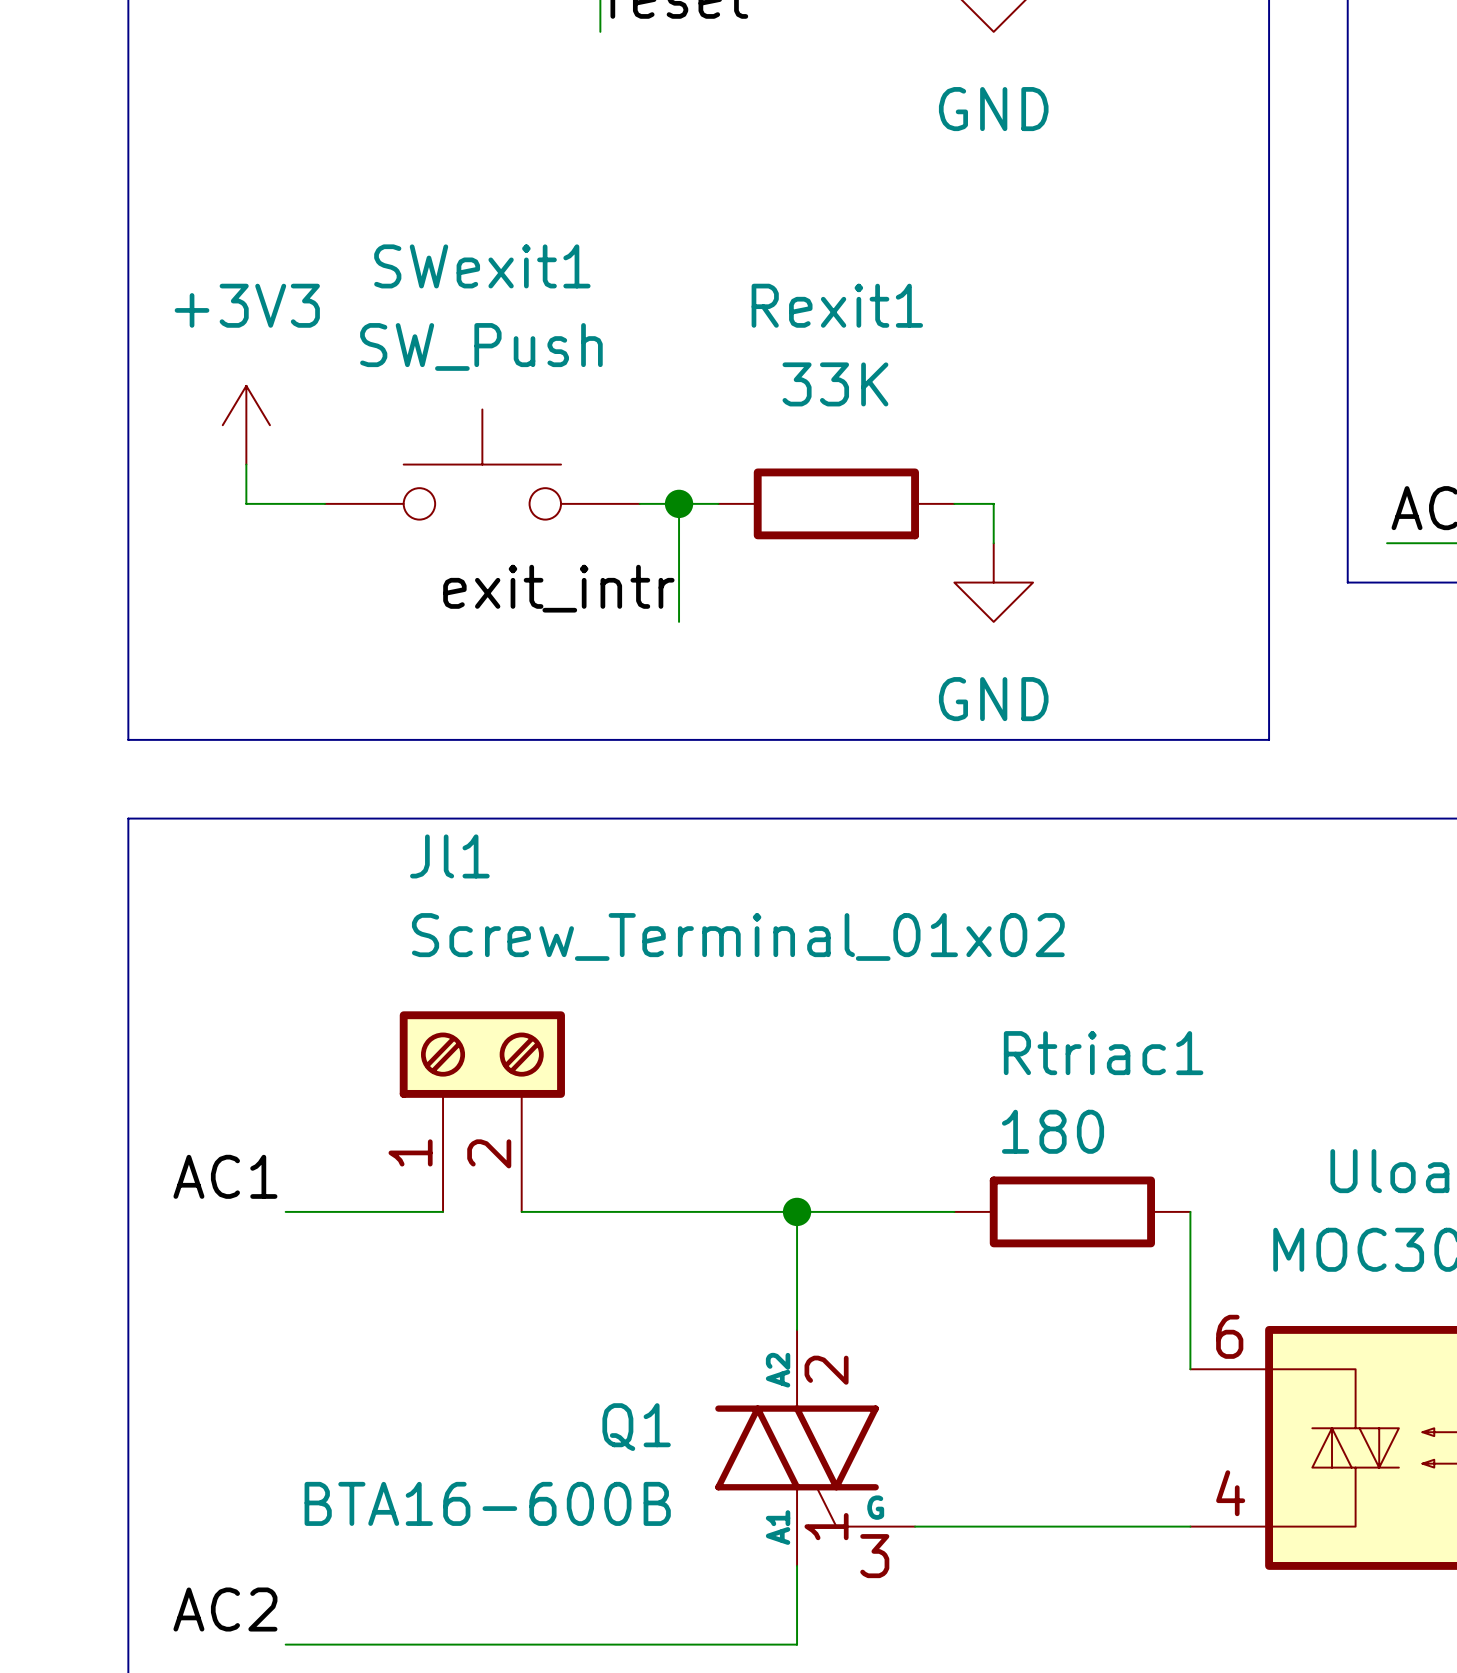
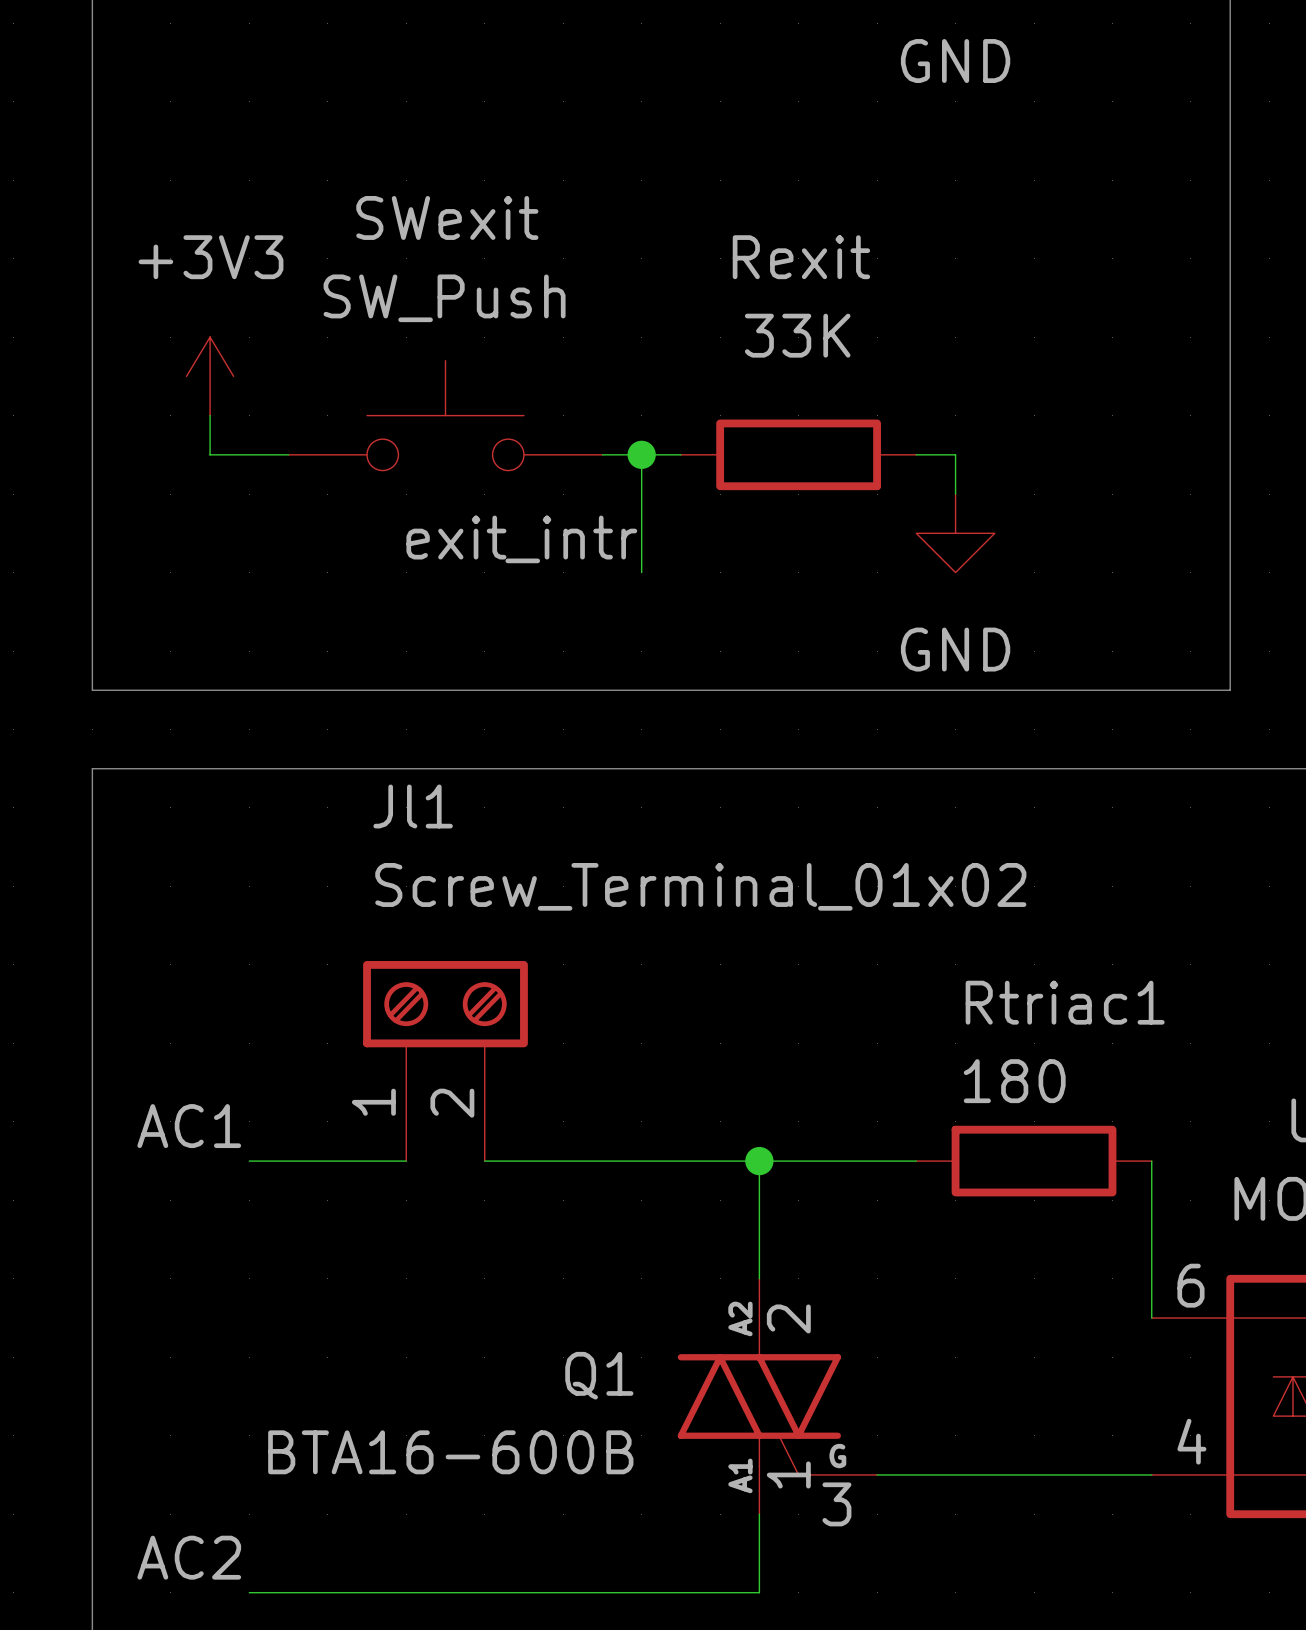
SWexit1 name: SWexit1 (482, 266) -> SWexit (447, 217)
Rexit1 name: Rexit1 (837, 305) -> Rexit (801, 257)

